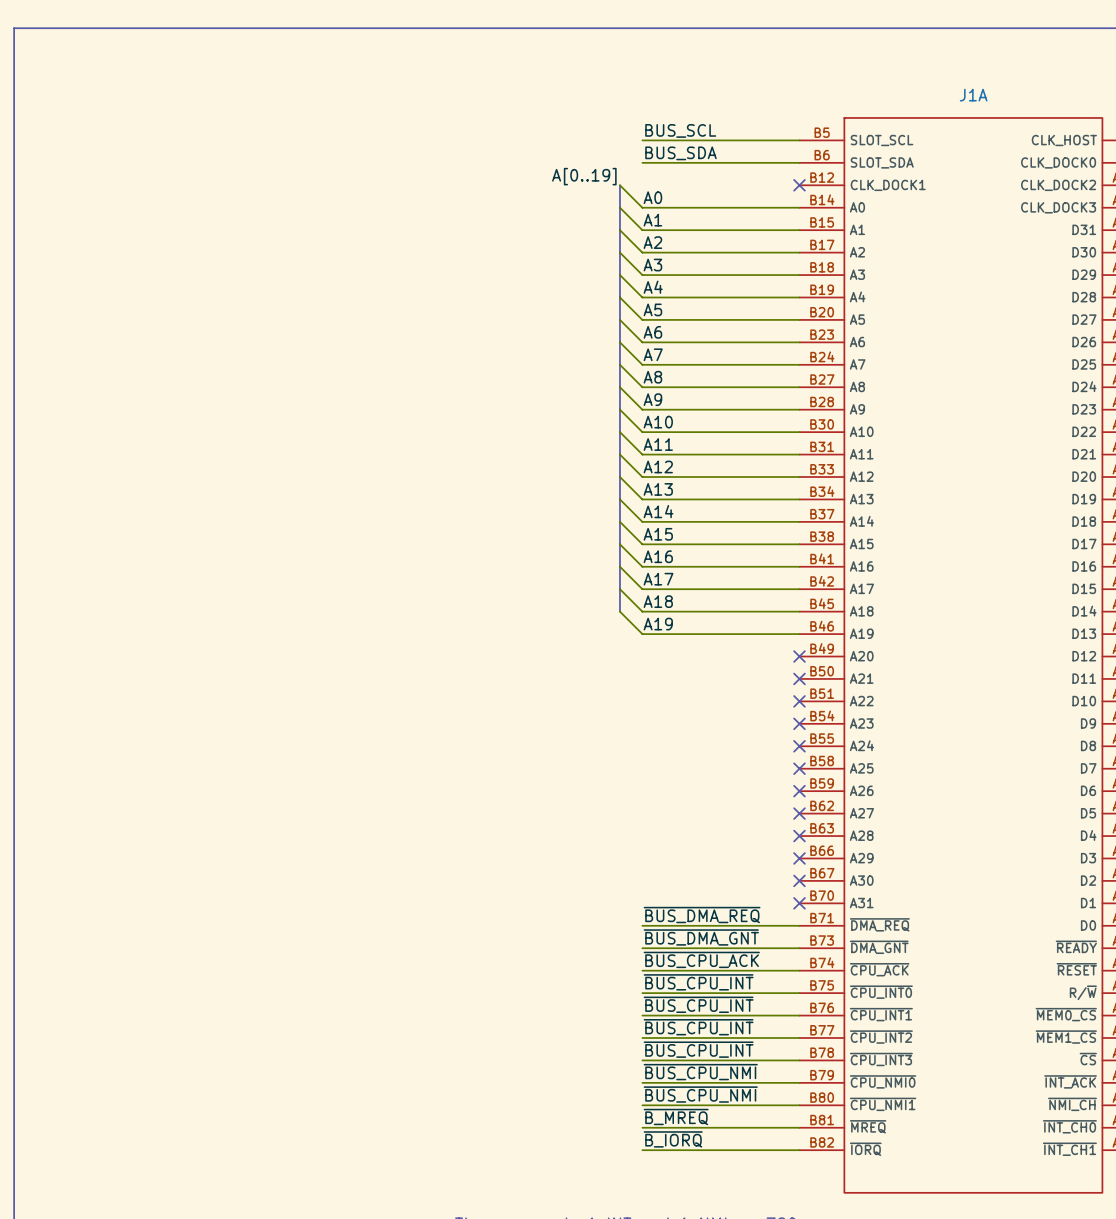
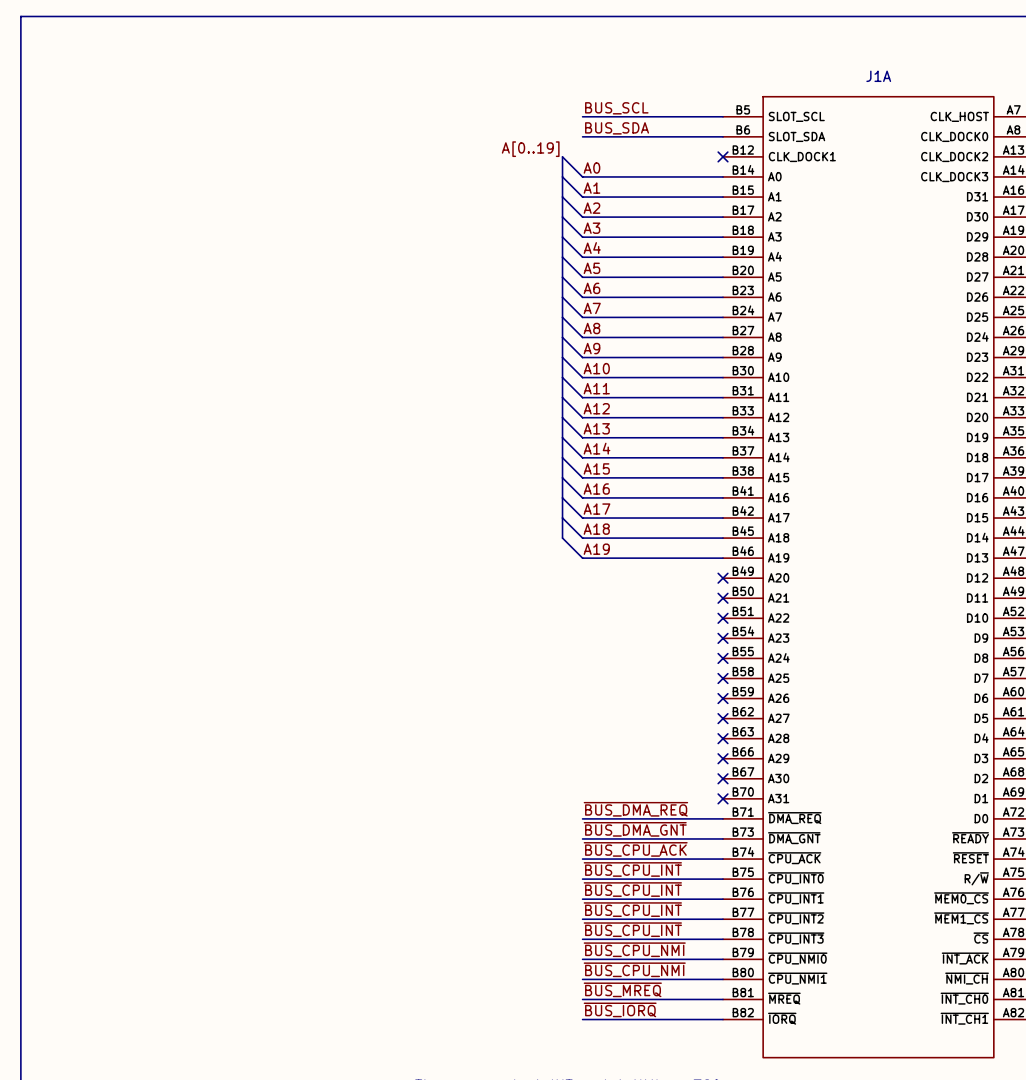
label: ~{B_MREQ} (676, 1116) -> ~{BUS_MREQ} (622, 989)
label: ~{B_IORQ} (673, 1139) -> ~{BUS_IORQ} (620, 1009)

